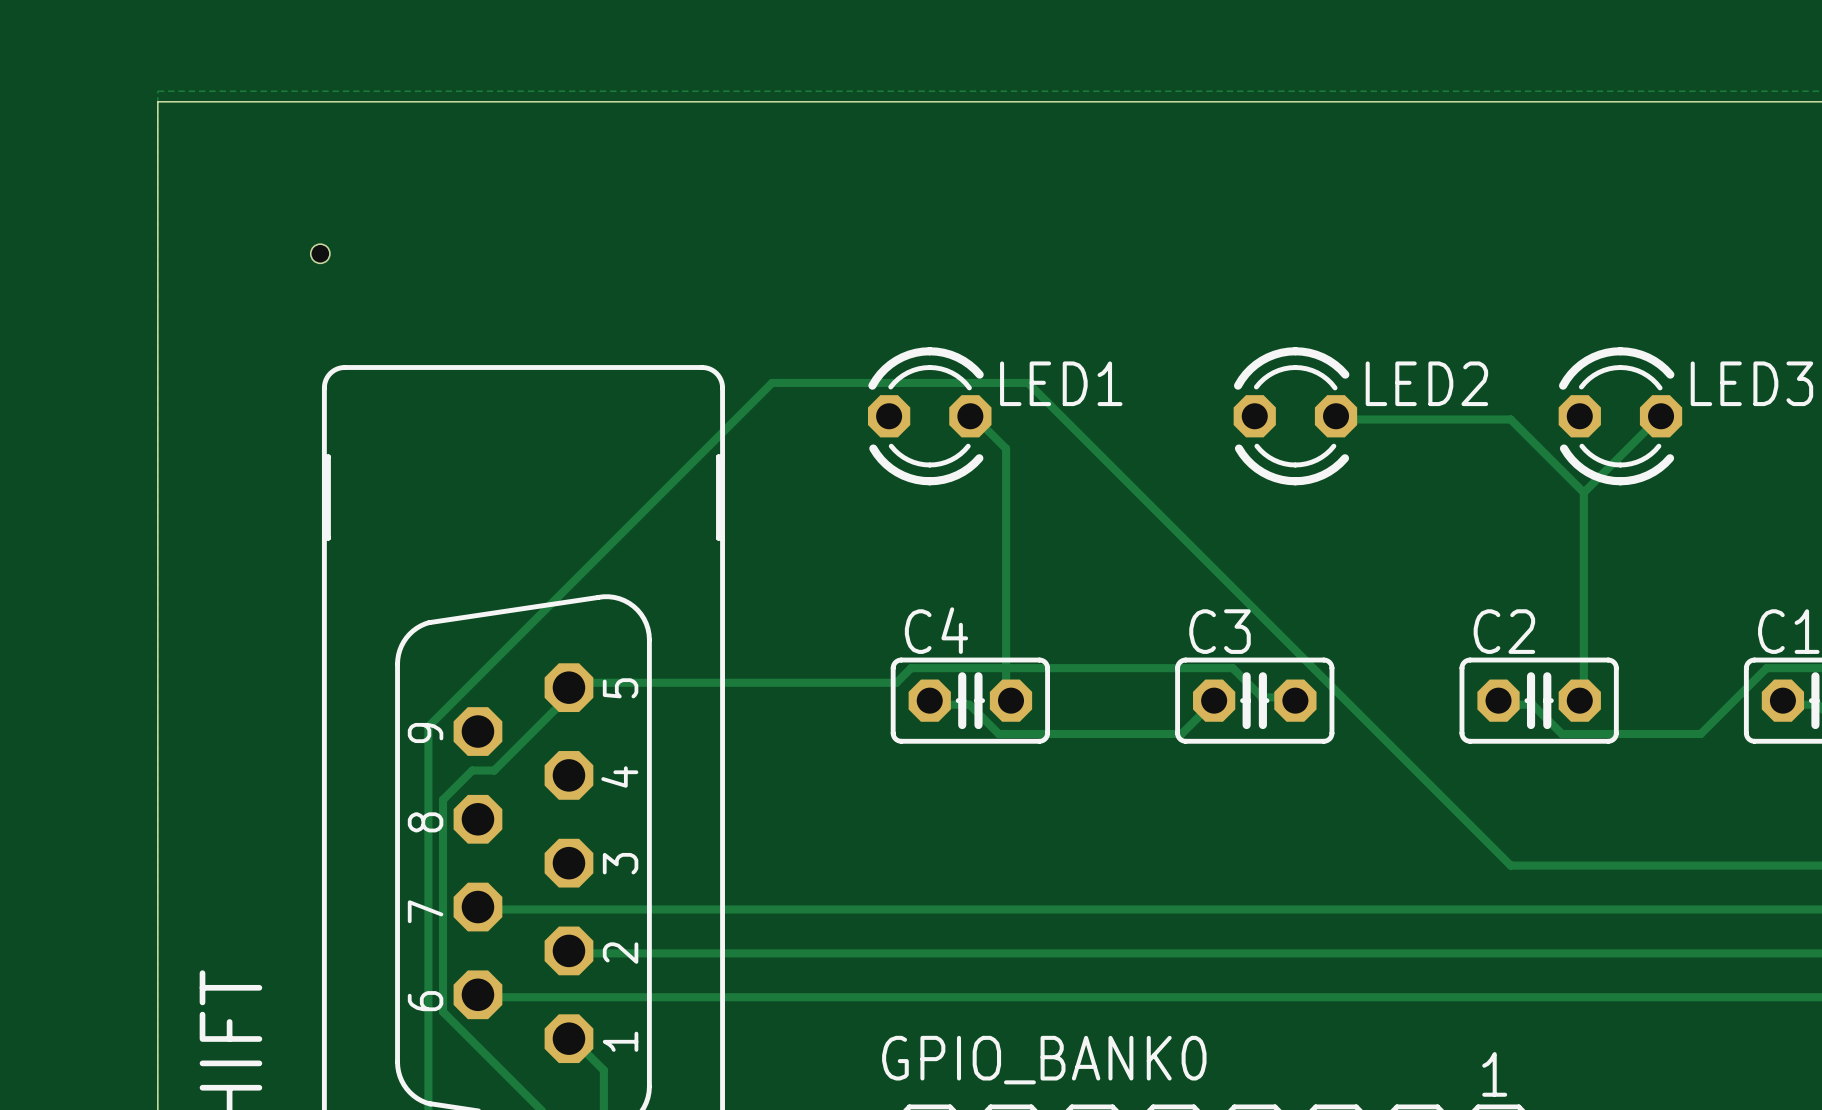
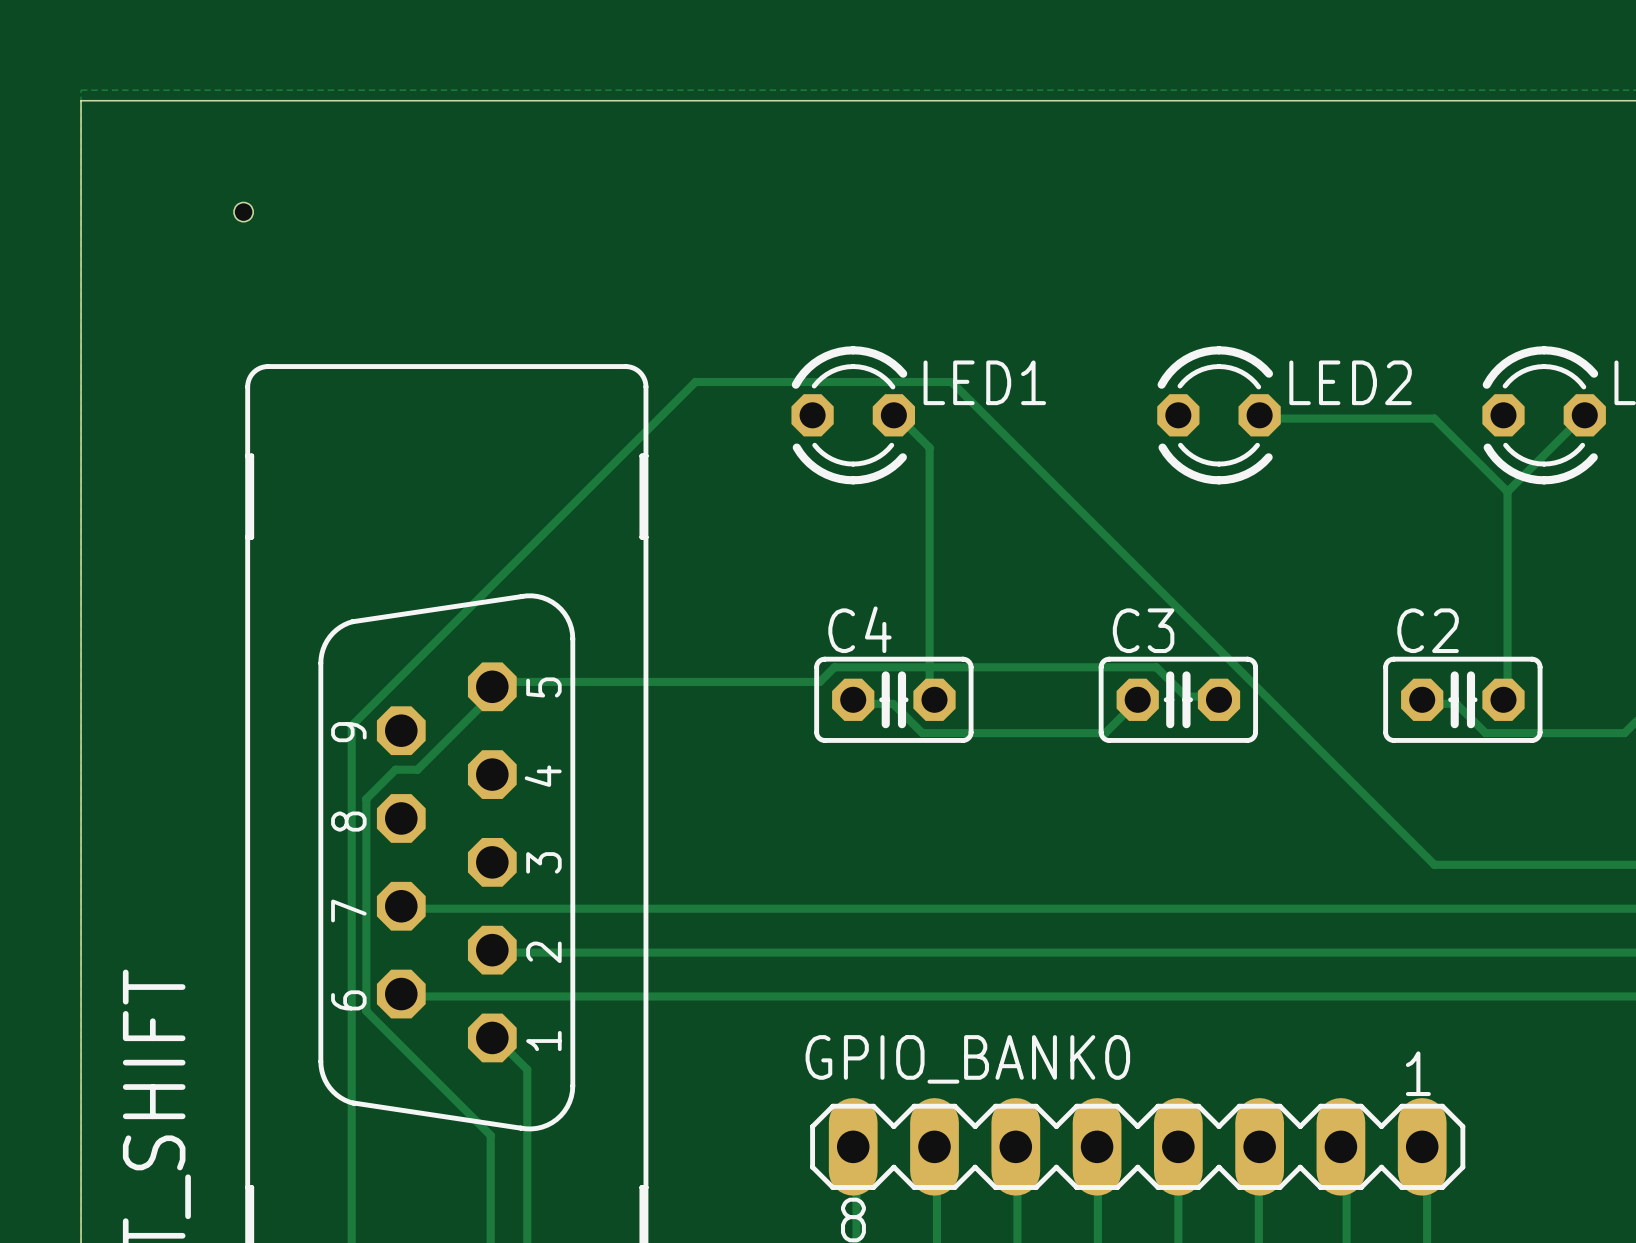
hole position: (320, 253) -> (243, 212)

